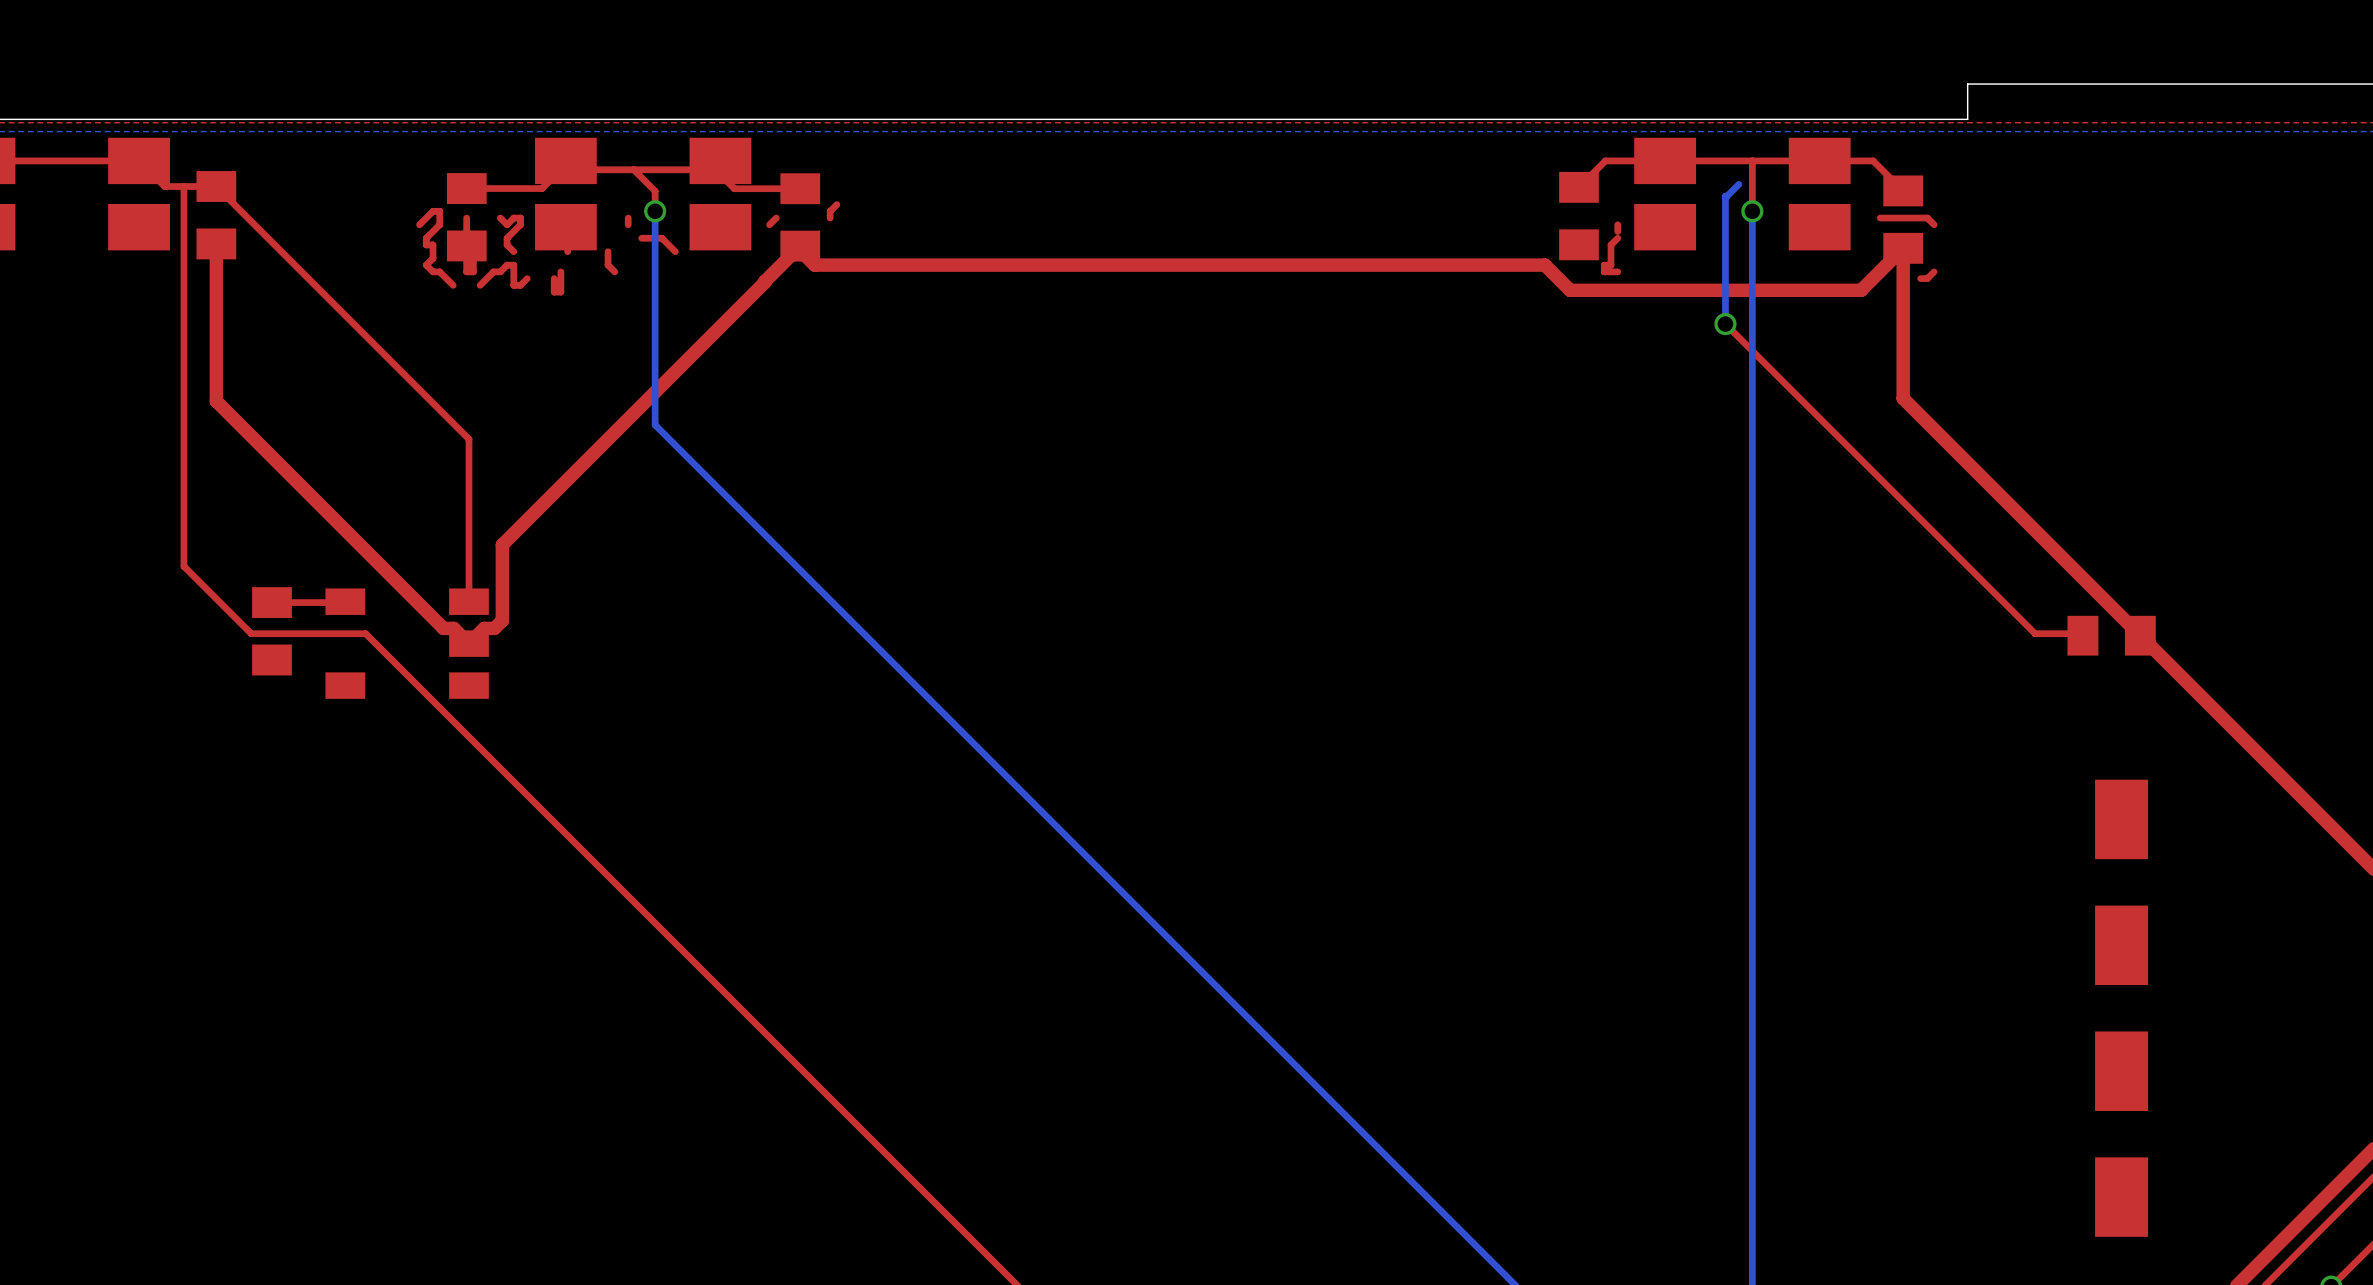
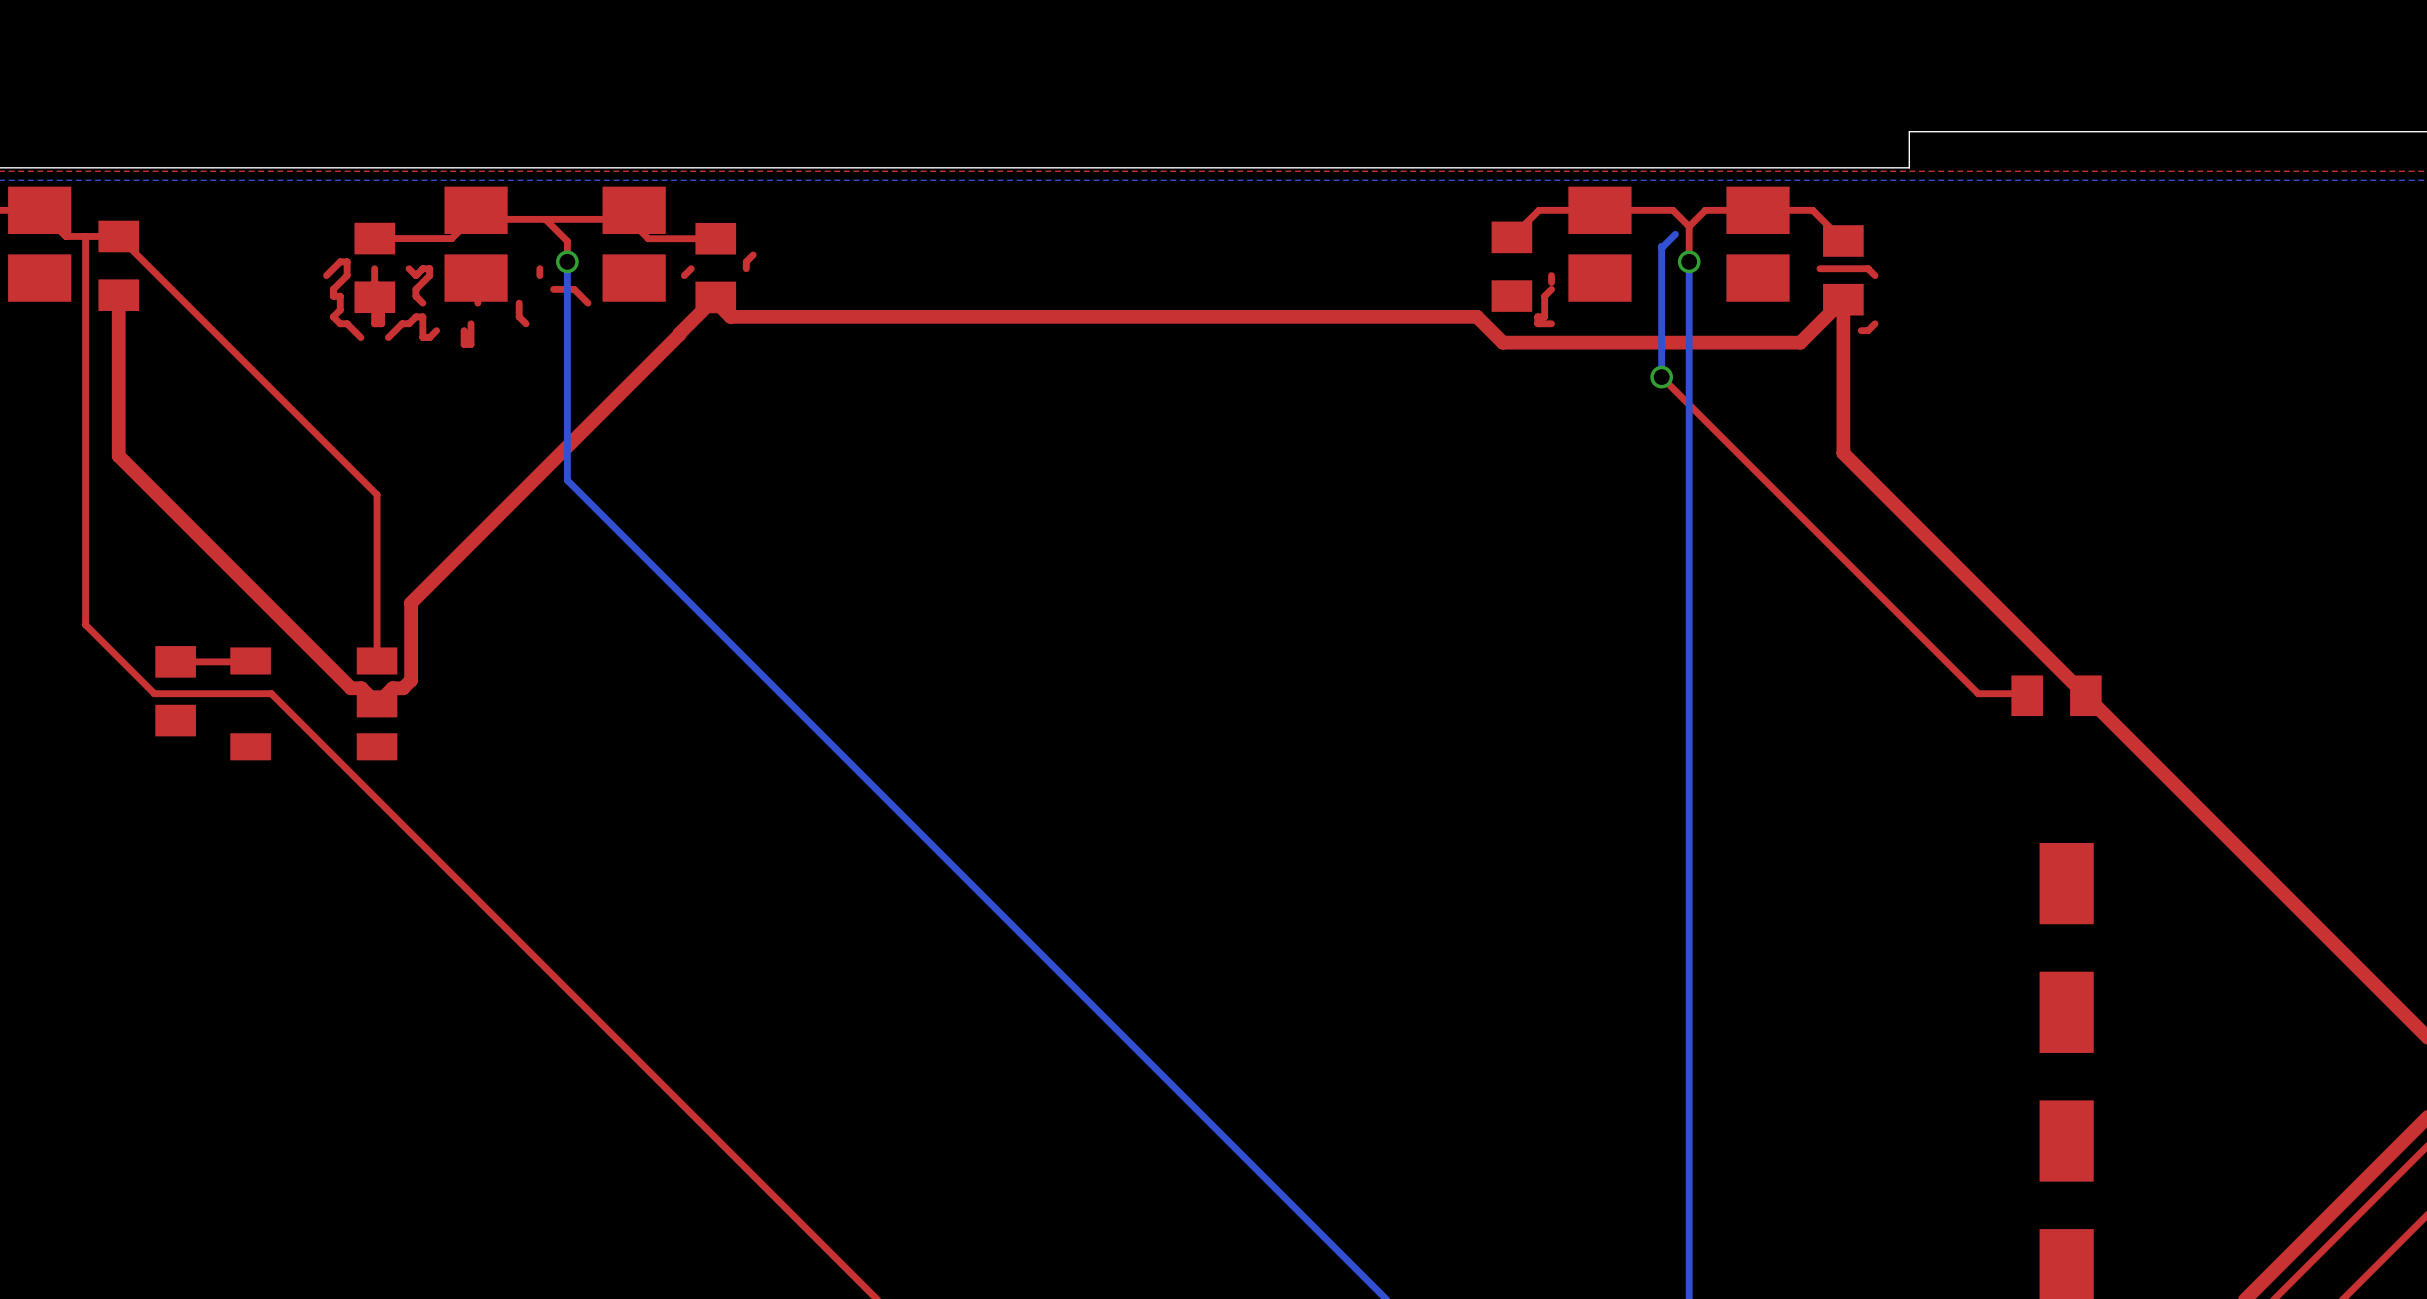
top track: (1752, 160) (1752, 176) -> none
top track: (1768, 160) (1736, 160) -> (1705, 210) (1689, 226) (1672, 210)

